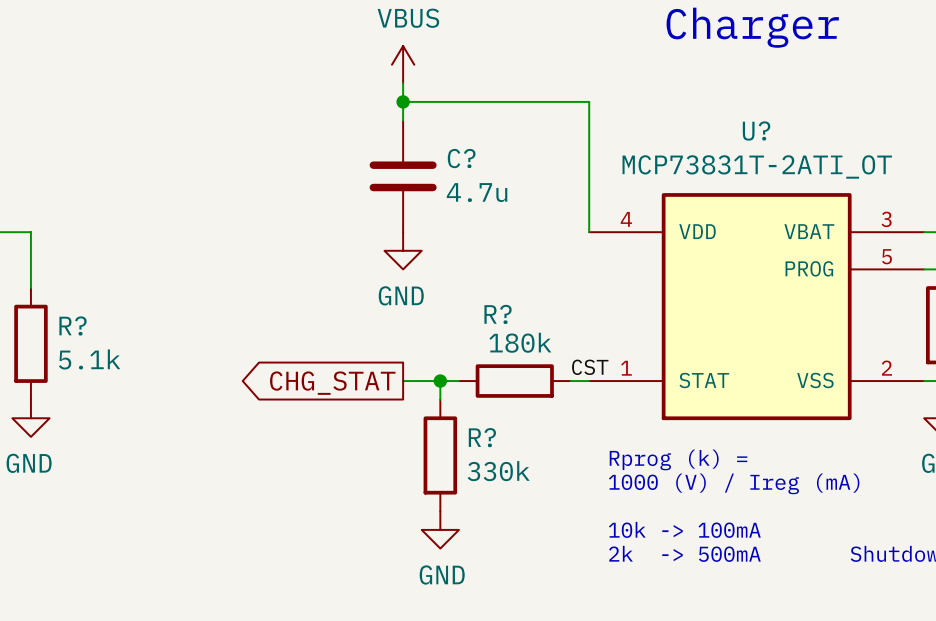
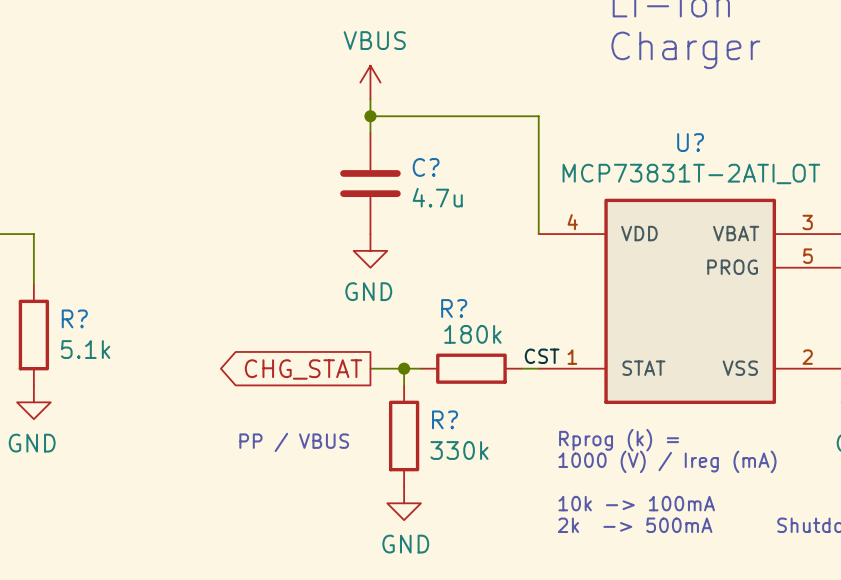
text: none -> PP / VBUS (294, 442)

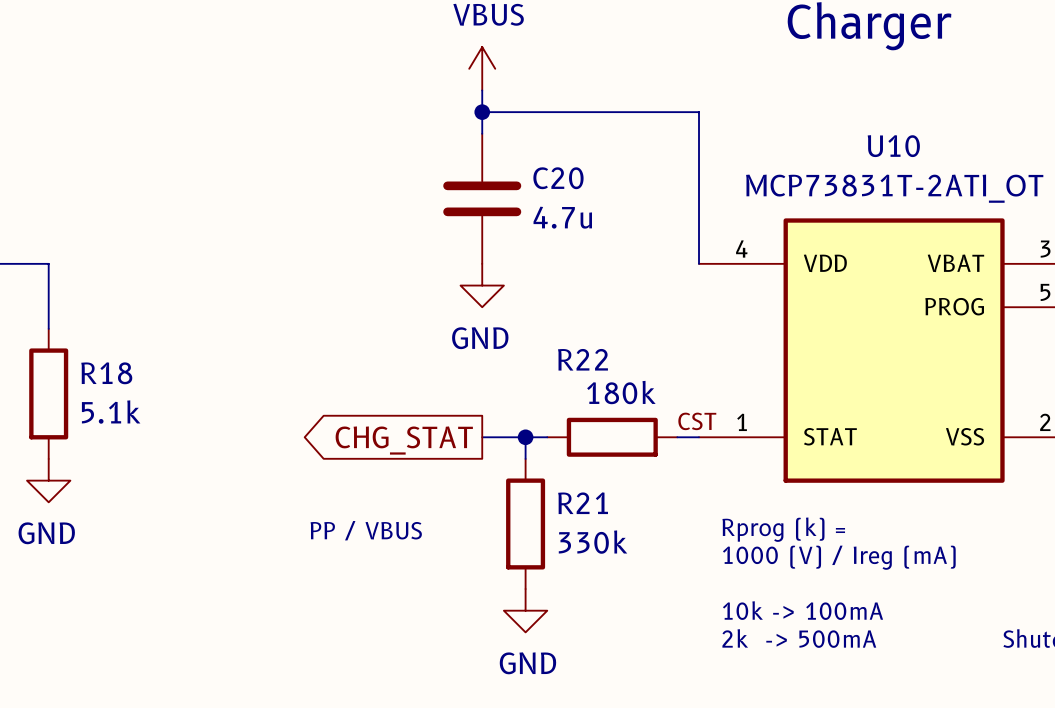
U? name: U? (690, 142) -> U10 (893, 146)
C? name: C? (426, 167) -> C20 (558, 178)
R? name: R? (454, 308) -> R22 (582, 359)
R? name: R? (74, 318) -> R18 (106, 373)
R? name: R? (445, 419) -> R21 (583, 503)

